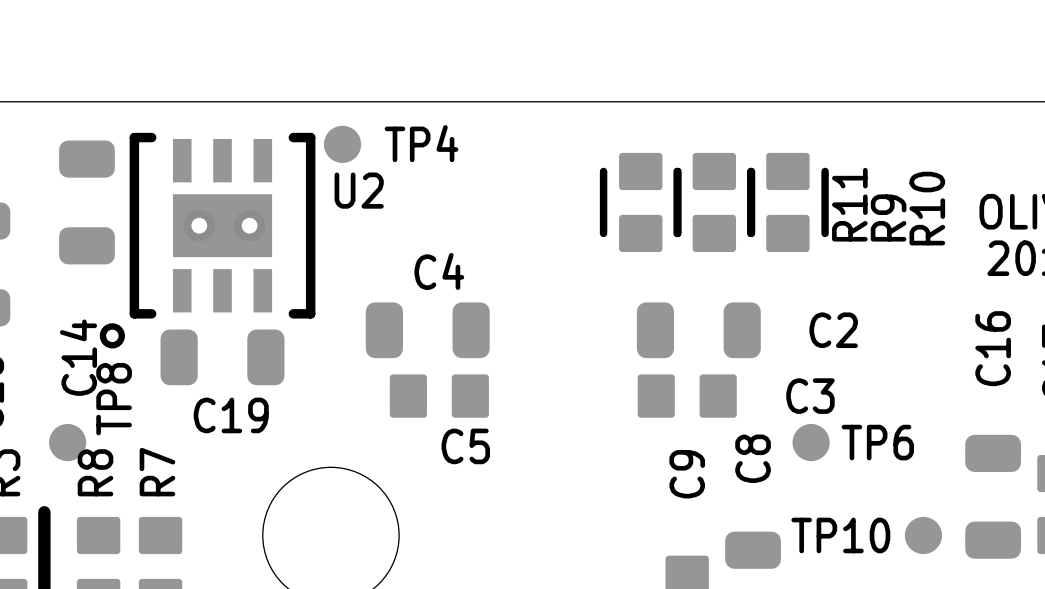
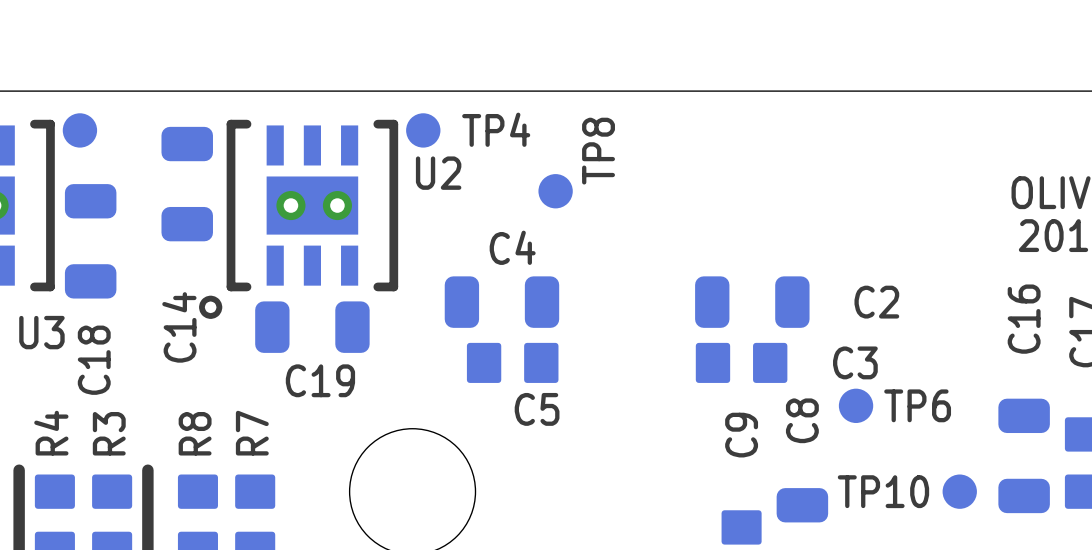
R11: (640, 202) -> none
R9: (714, 202) -> none
R10: (787, 202) -> none
TP8 position: (67, 442) -> (555, 191)

